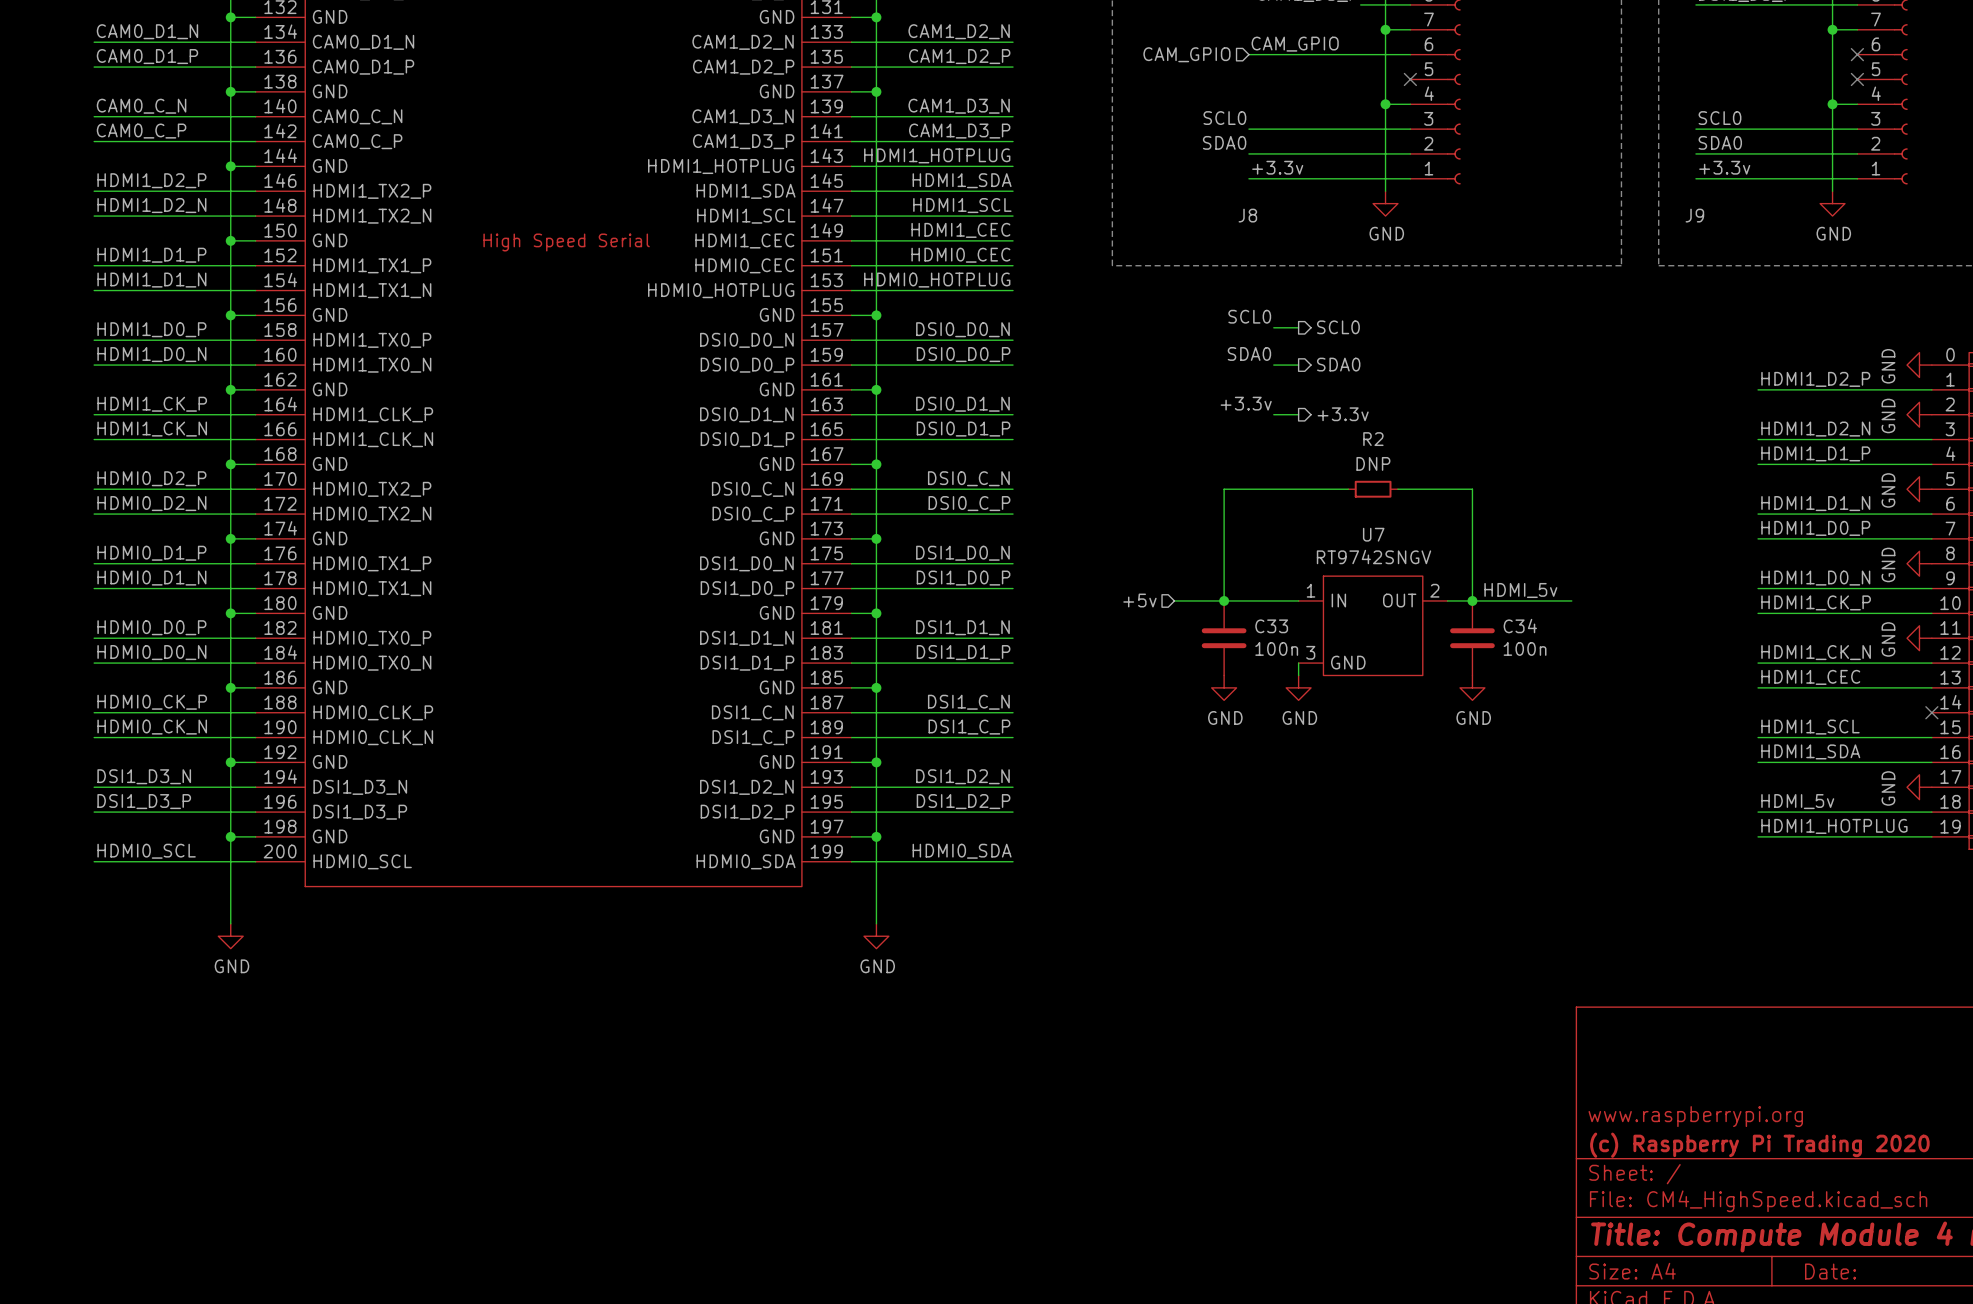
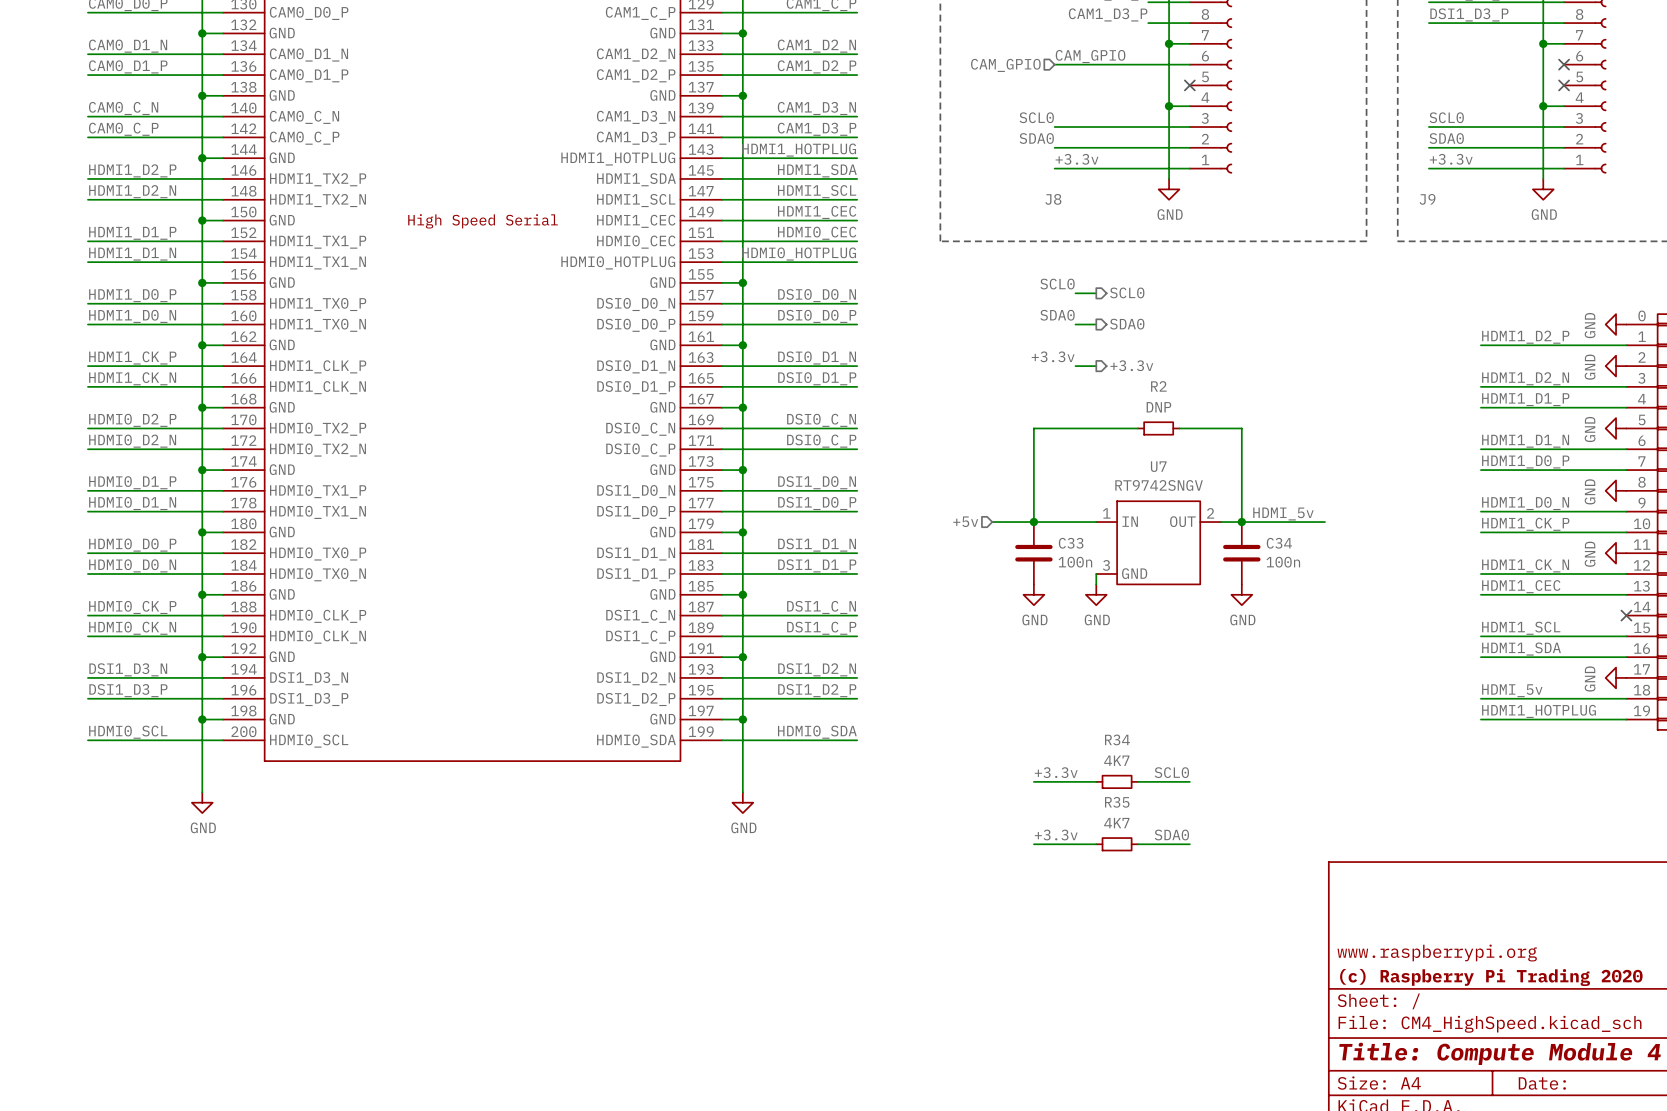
label: none -> +3.3v (1056, 772)
label: none -> SCL0 (1171, 772)
wire: none -> (1033, 781) (1096, 781)
R34: none -> 4K7 (1117, 781)
wire: none -> (1137, 781) (1189, 781)
label: none -> +3.3v (1056, 835)
label: none -> SDA0 (1171, 835)
wire: none -> (1033, 844) (1096, 844)
R35: none -> 4K7 (1117, 844)
wire: none -> (1137, 844) (1189, 844)

